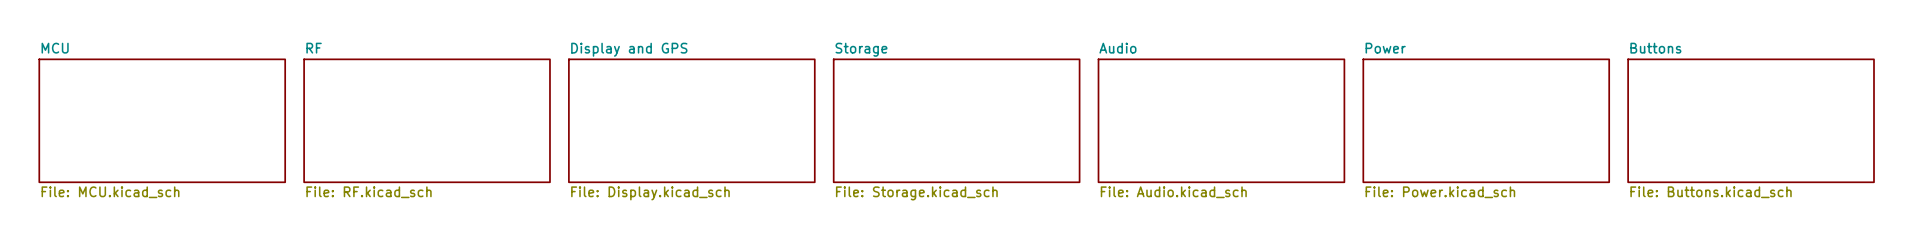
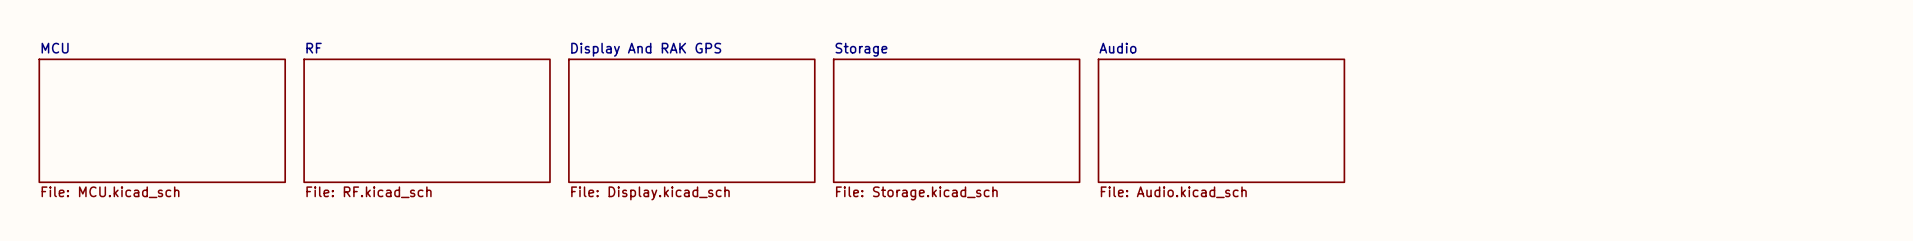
sheet Display and GPS name: Display and GPS (629, 49) -> Display And RAK GPS (646, 49)
sheet Power: File: Power.kicad_sch (1486, 120) -> none
sheet Buttons: File: Buttons.kicad_sch (1751, 120) -> none

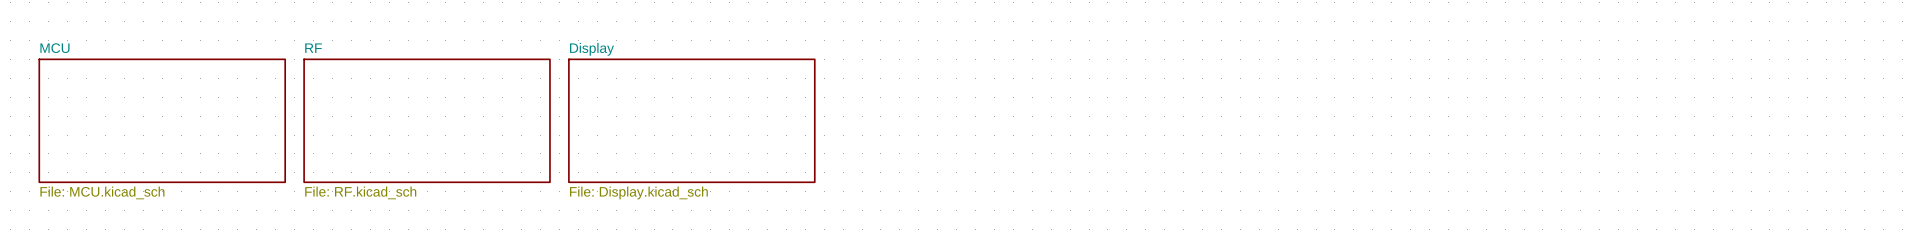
sheet Display And RAK GPS name: Display And RAK GPS (646, 49) -> Display (591, 49)
sheet Storage: File: Storage.kicad_sch (956, 120) -> none
sheet Audio: File: Audio.kicad_sch (1221, 120) -> none

